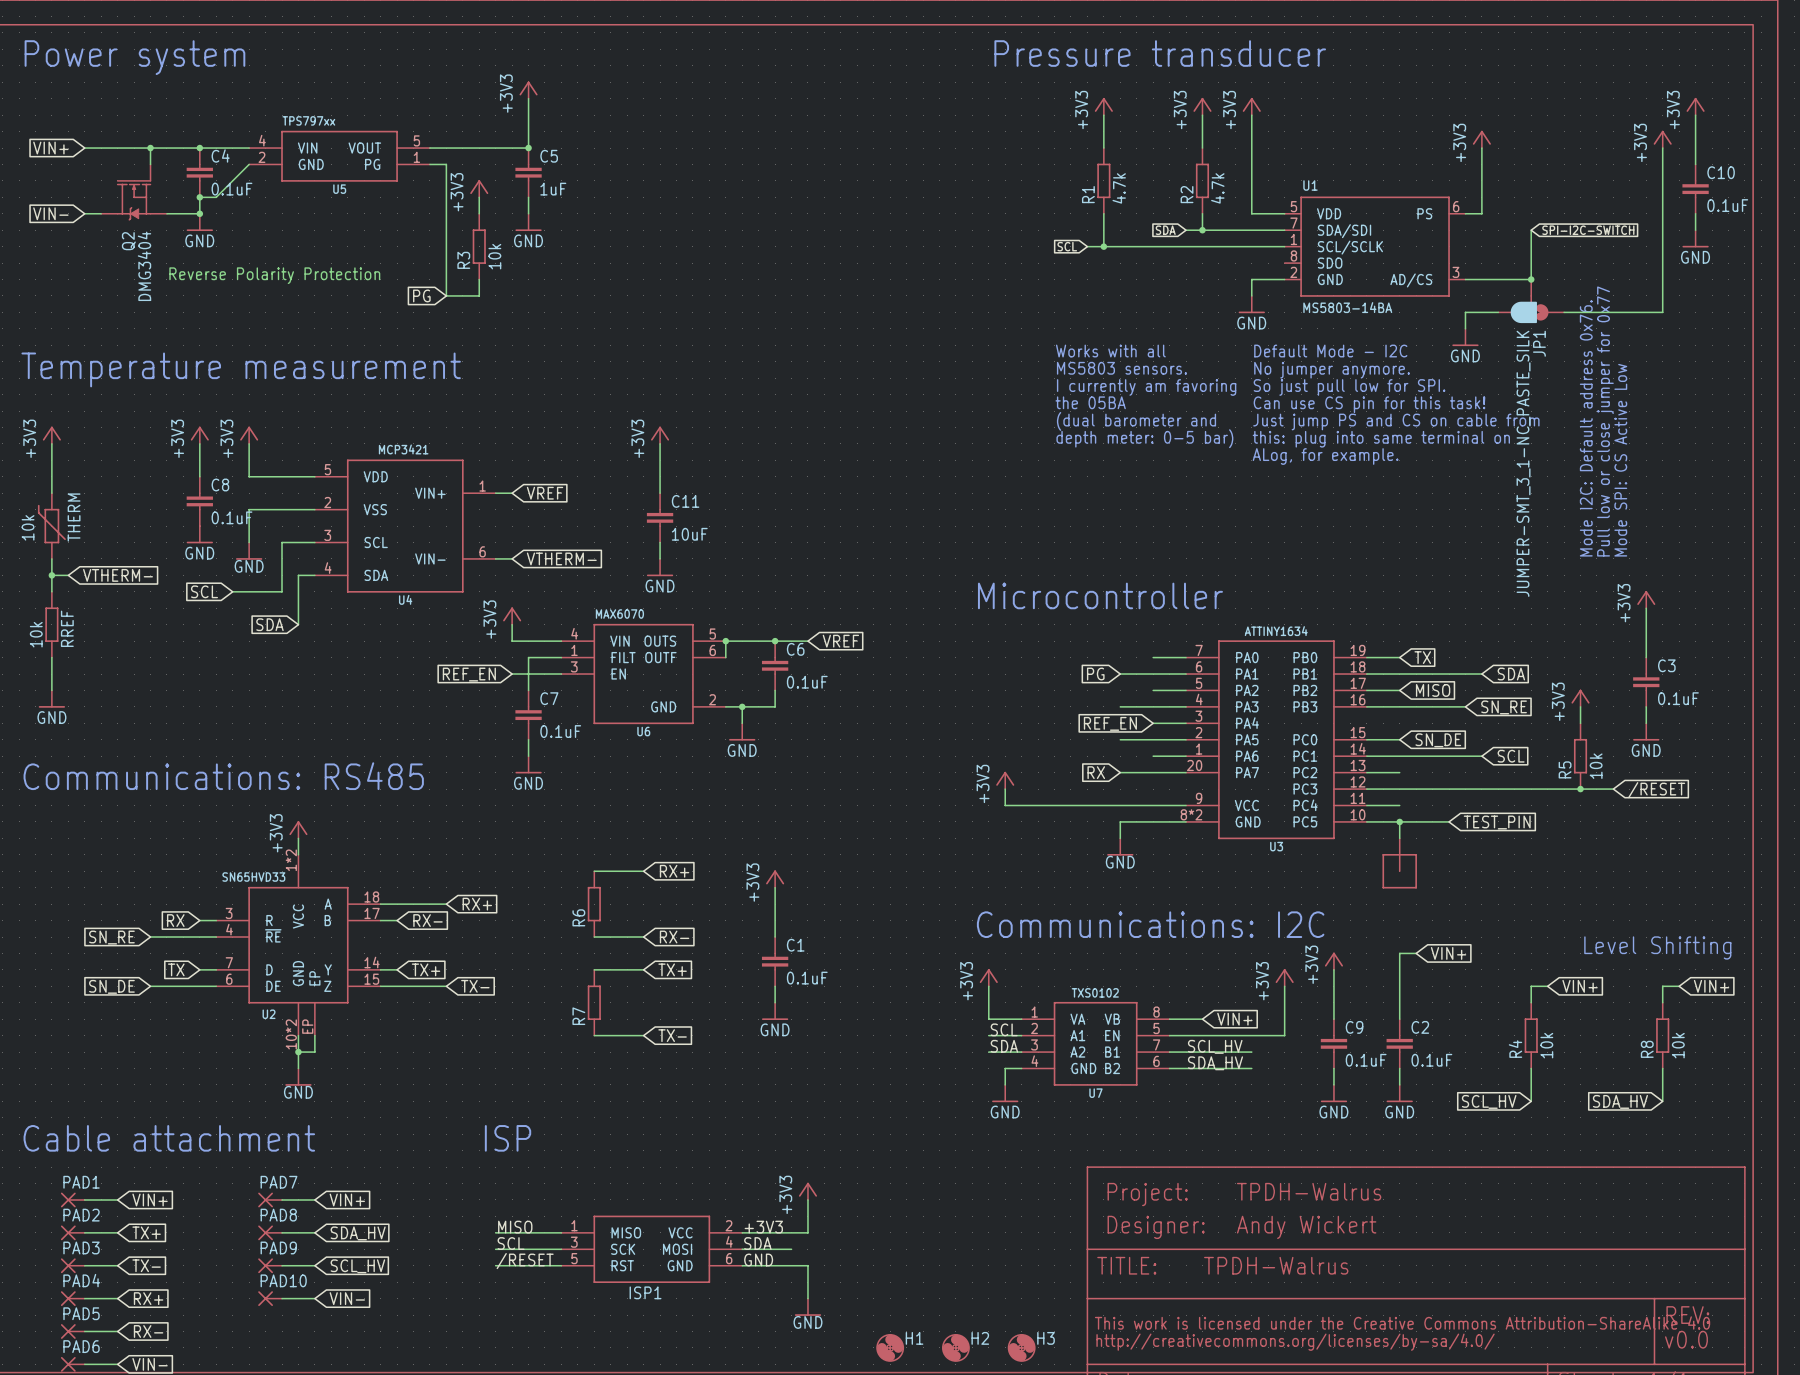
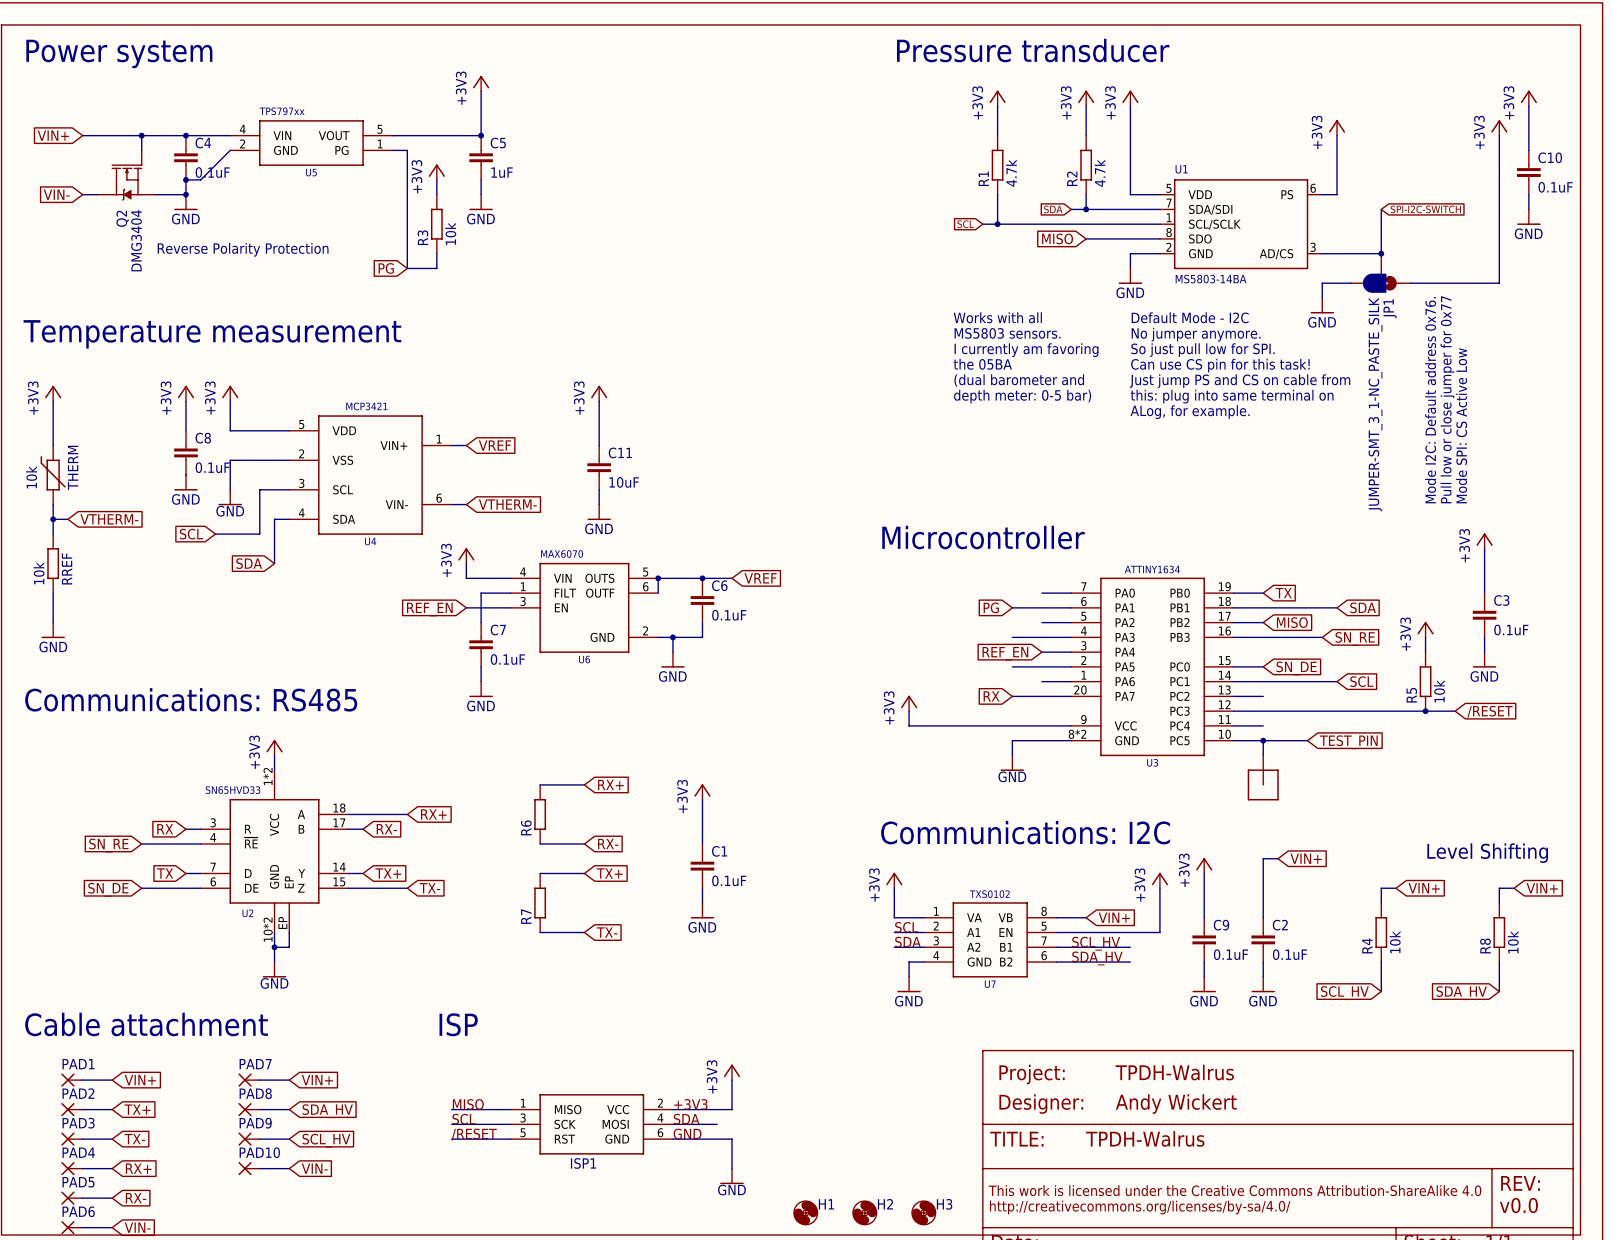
global label: none -> MISO (1057, 238)
wire: none -> (1086, 238) (1159, 238)

